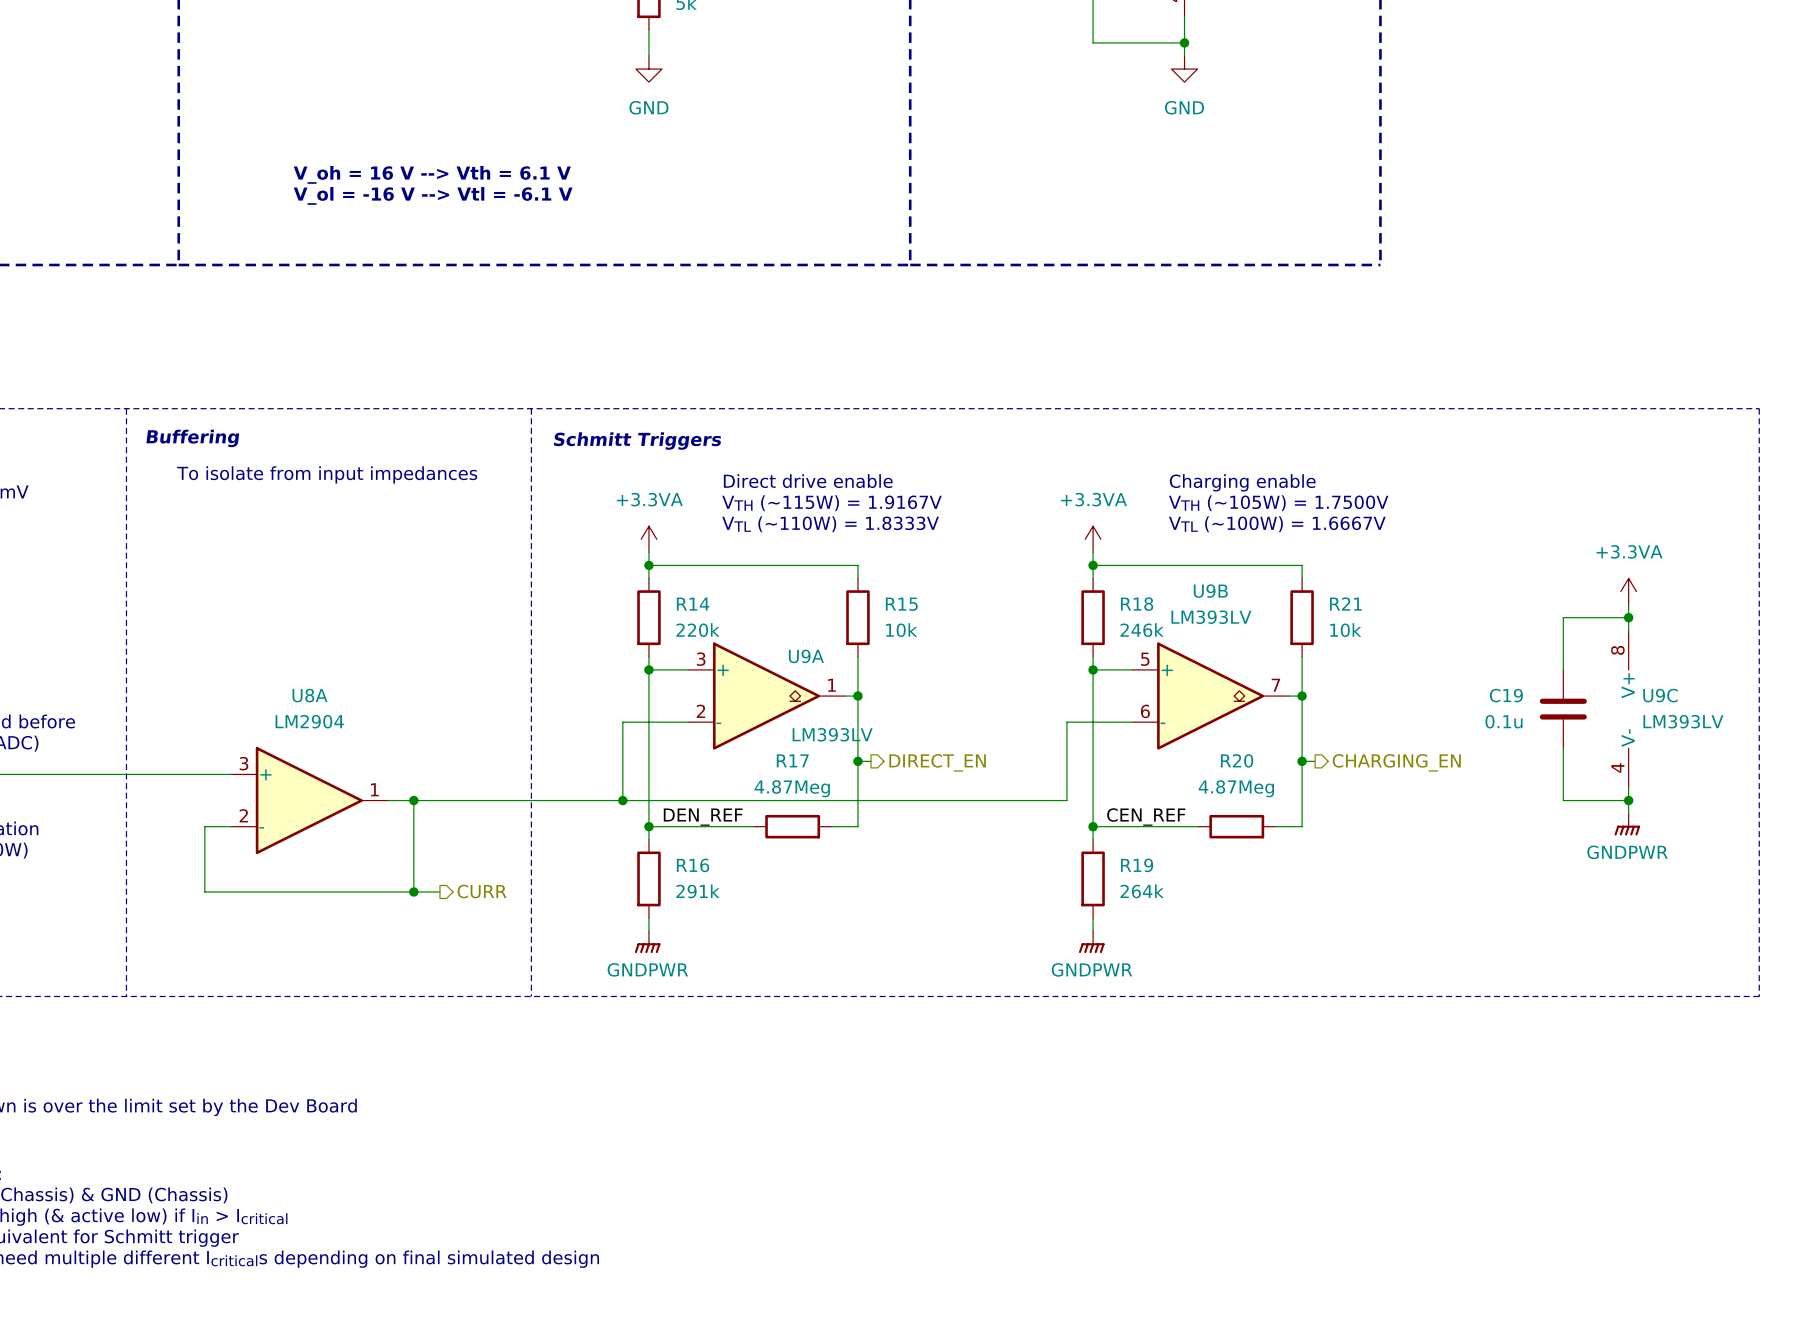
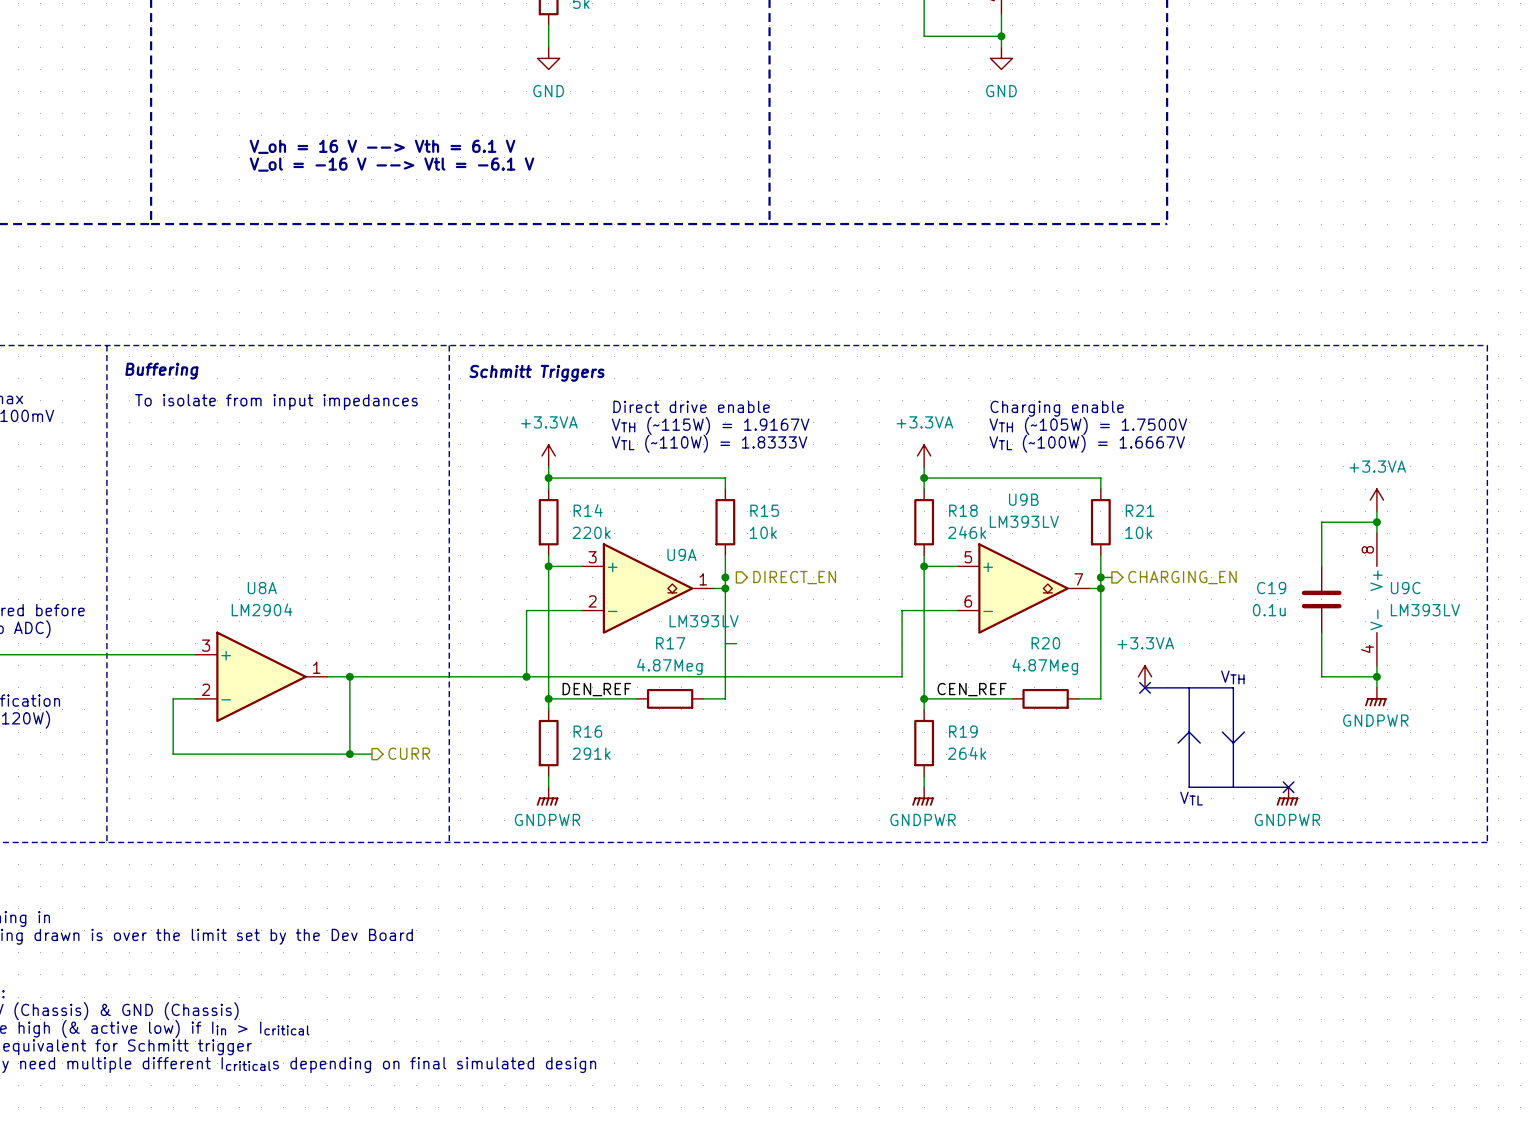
junction: none -> (725, 577)
junction: none -> (1100, 577)
junction: (857, 761) -> none
wire: (1302, 761) (1315, 761) -> (1100, 577) (1111, 577)
junction: (1302, 761) -> none
hierarchical label position: DIRECT_EN (937, 762) -> DIRECT_EN (794, 577)
hierarchical label position: CHARGING_EN (1396, 762) -> CHARGING_EN (1182, 577)
power symbol: none -> +3.3VA (1145, 676)
text: none -> VTH (1232, 677)
line: none -> (1145, 687) (1233, 687) (1233, 787)
no-connect mark: none -> (1145, 687)
line: none -> (1189, 687) (1189, 787) (1288, 787)
line: none -> (1222, 732) (1233, 743) (1244, 732)
line: none -> (1178, 743) (1189, 732) (1200, 743)
no-connect mark: none -> (1288, 787)
power symbol: none -> GNDPWR (1287, 796)
text: none -> VTL (1191, 798)

